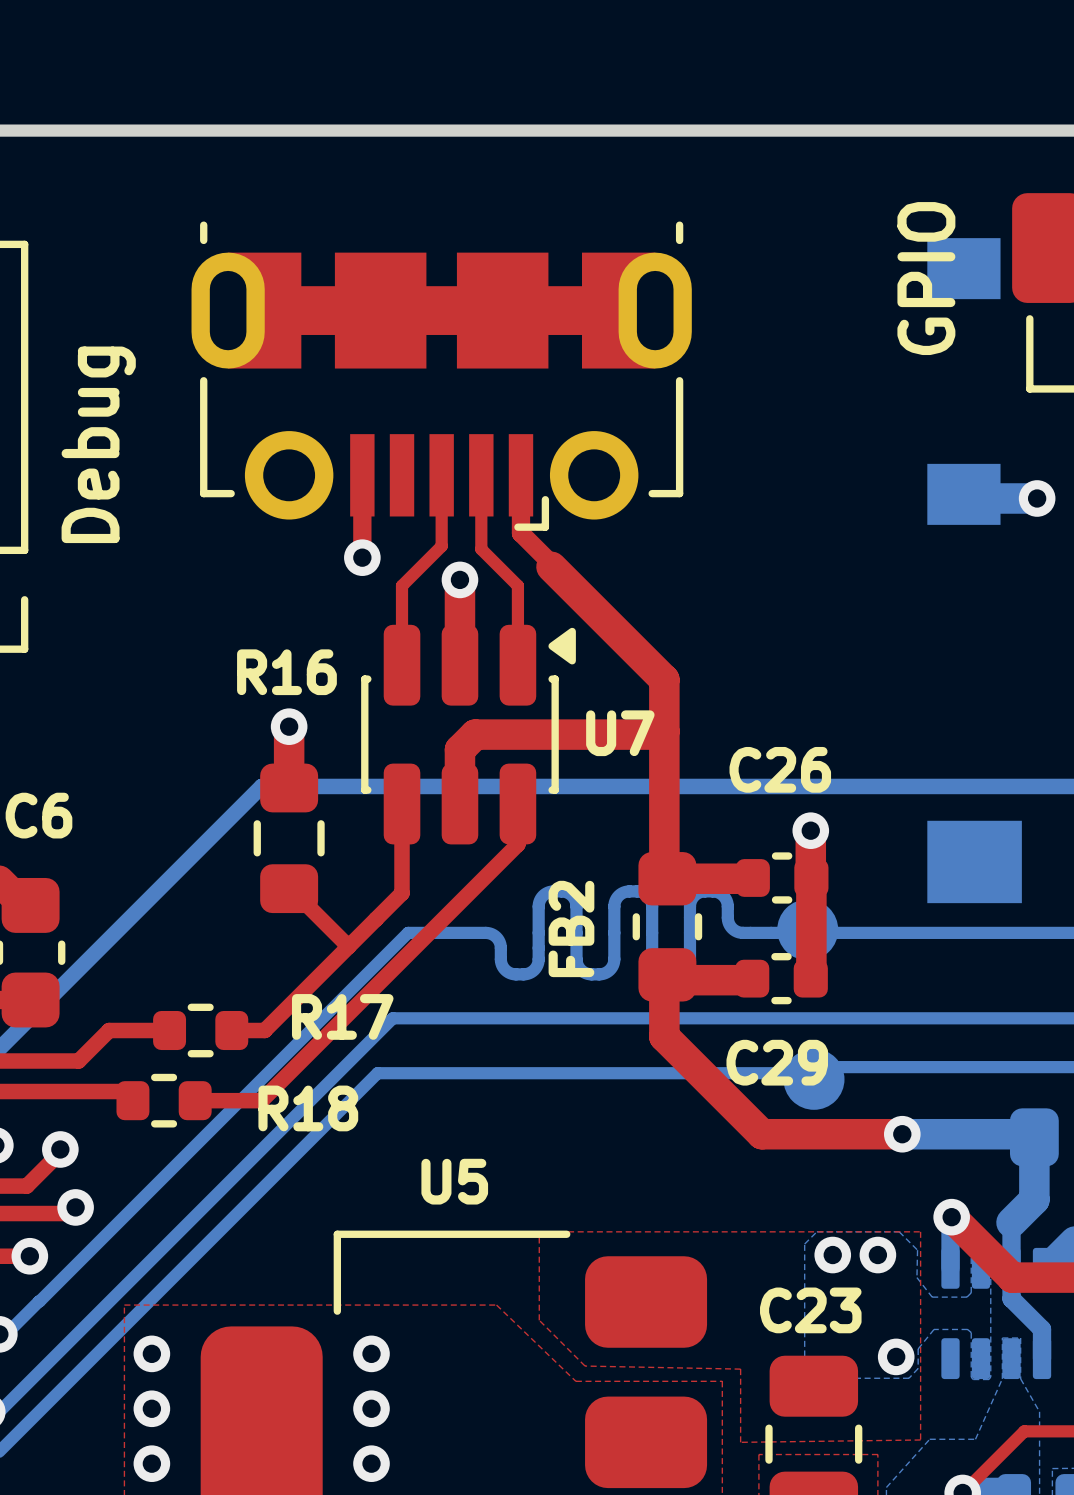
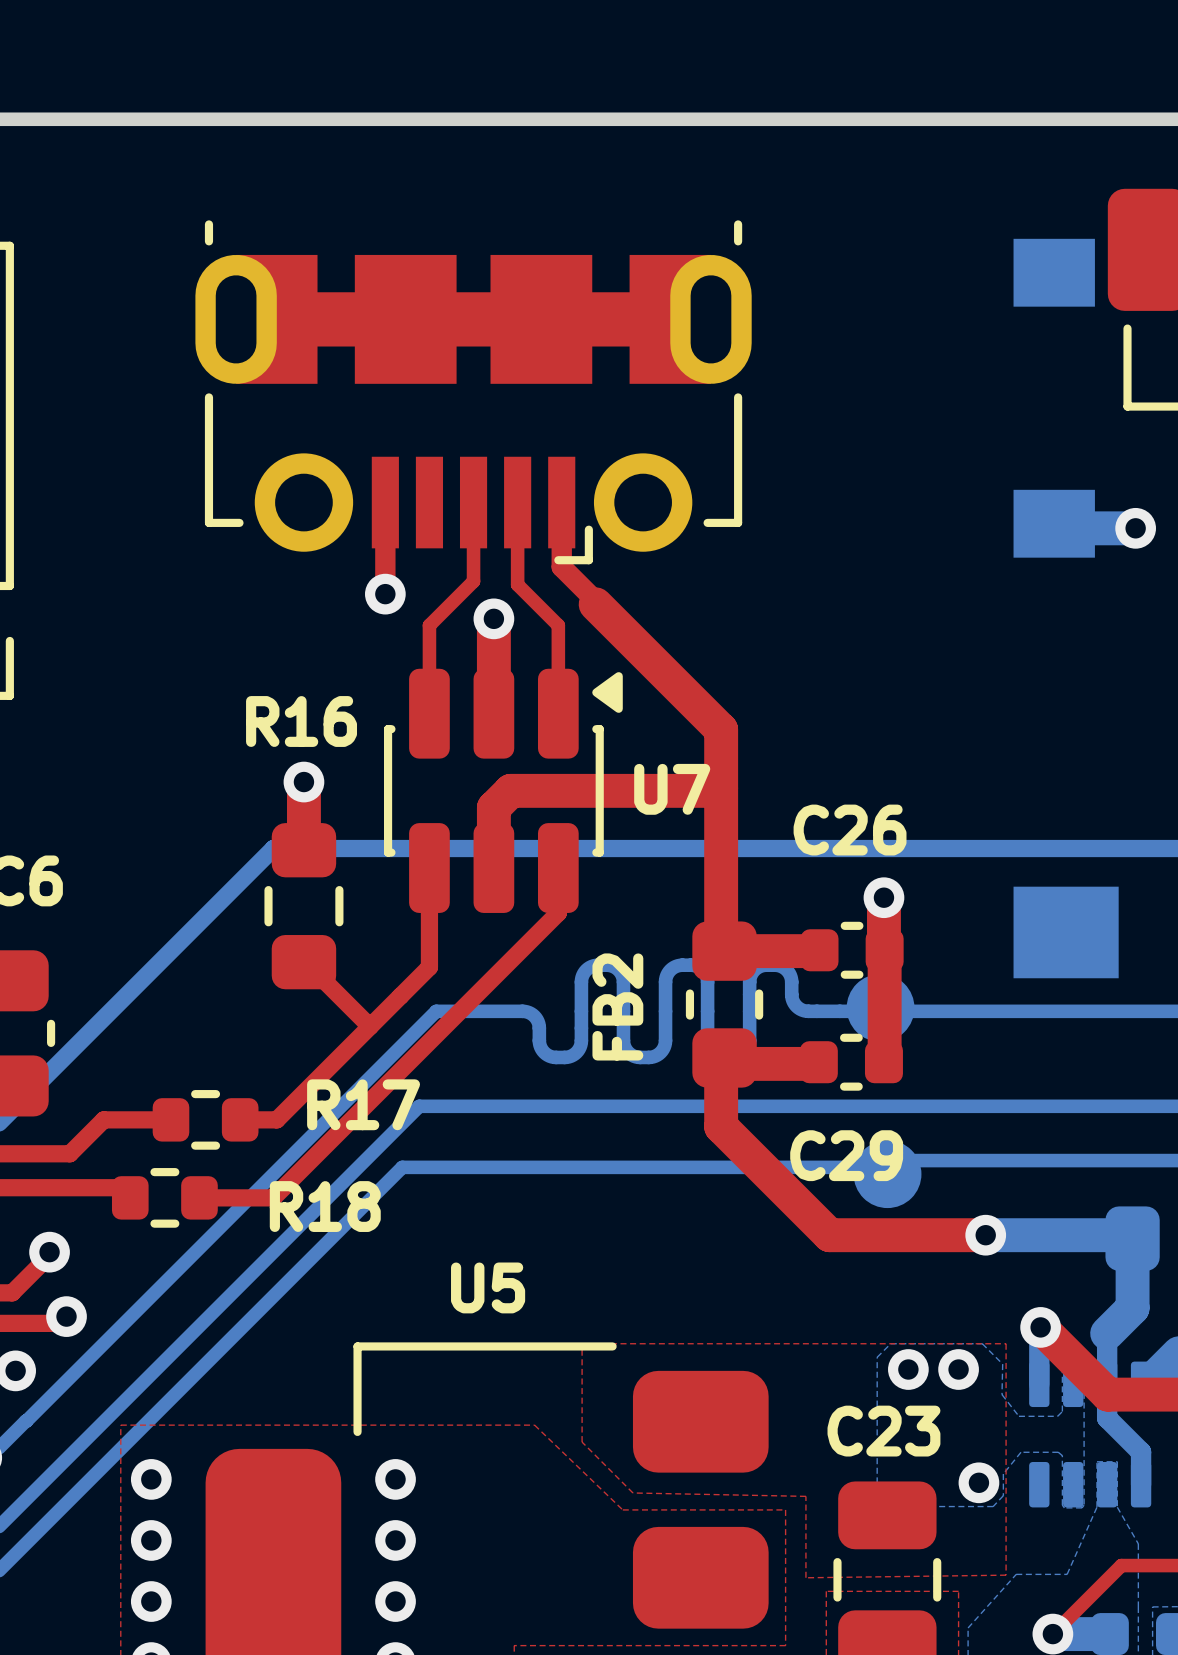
text: GPIO (926, 278) -> none
text: Debug (98, 444) -> none

